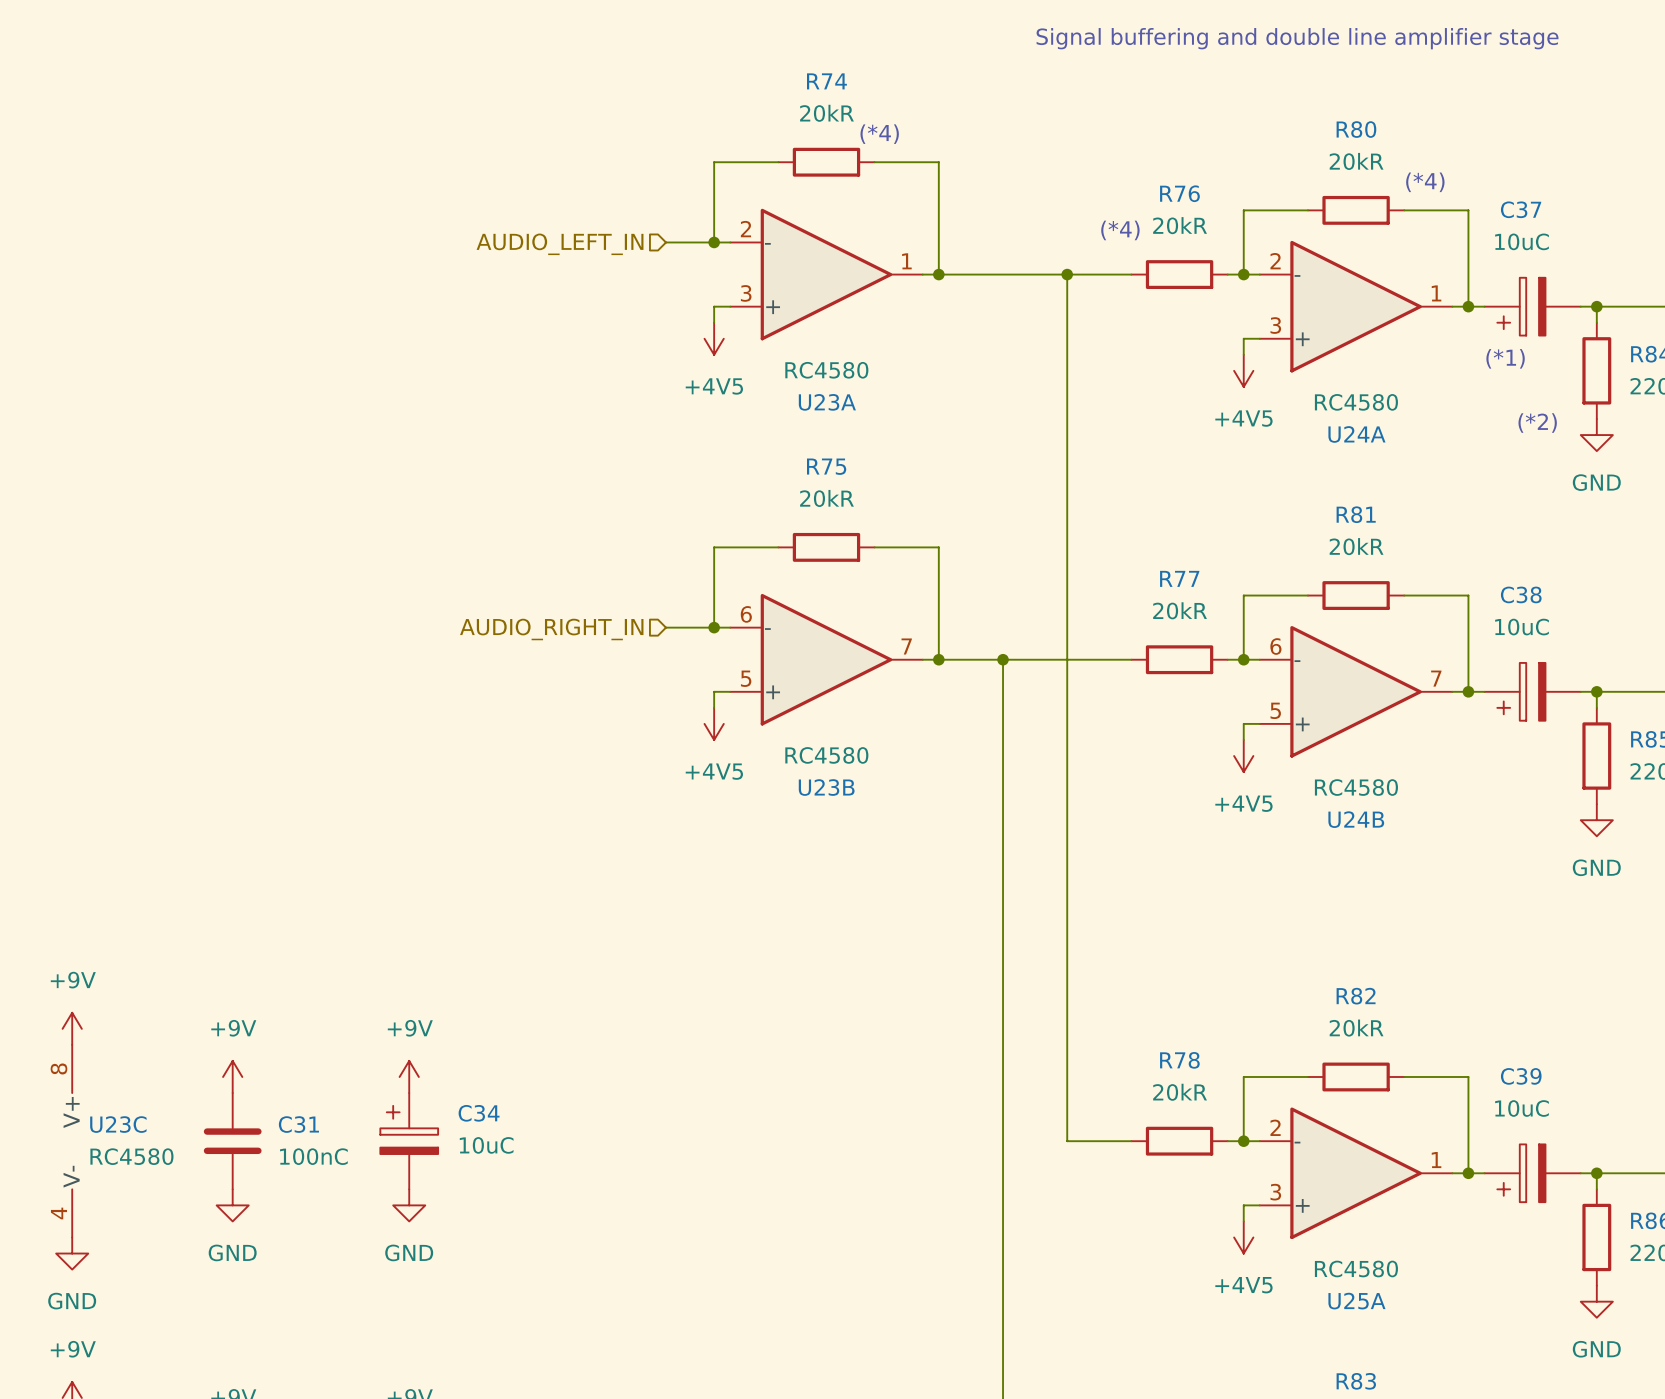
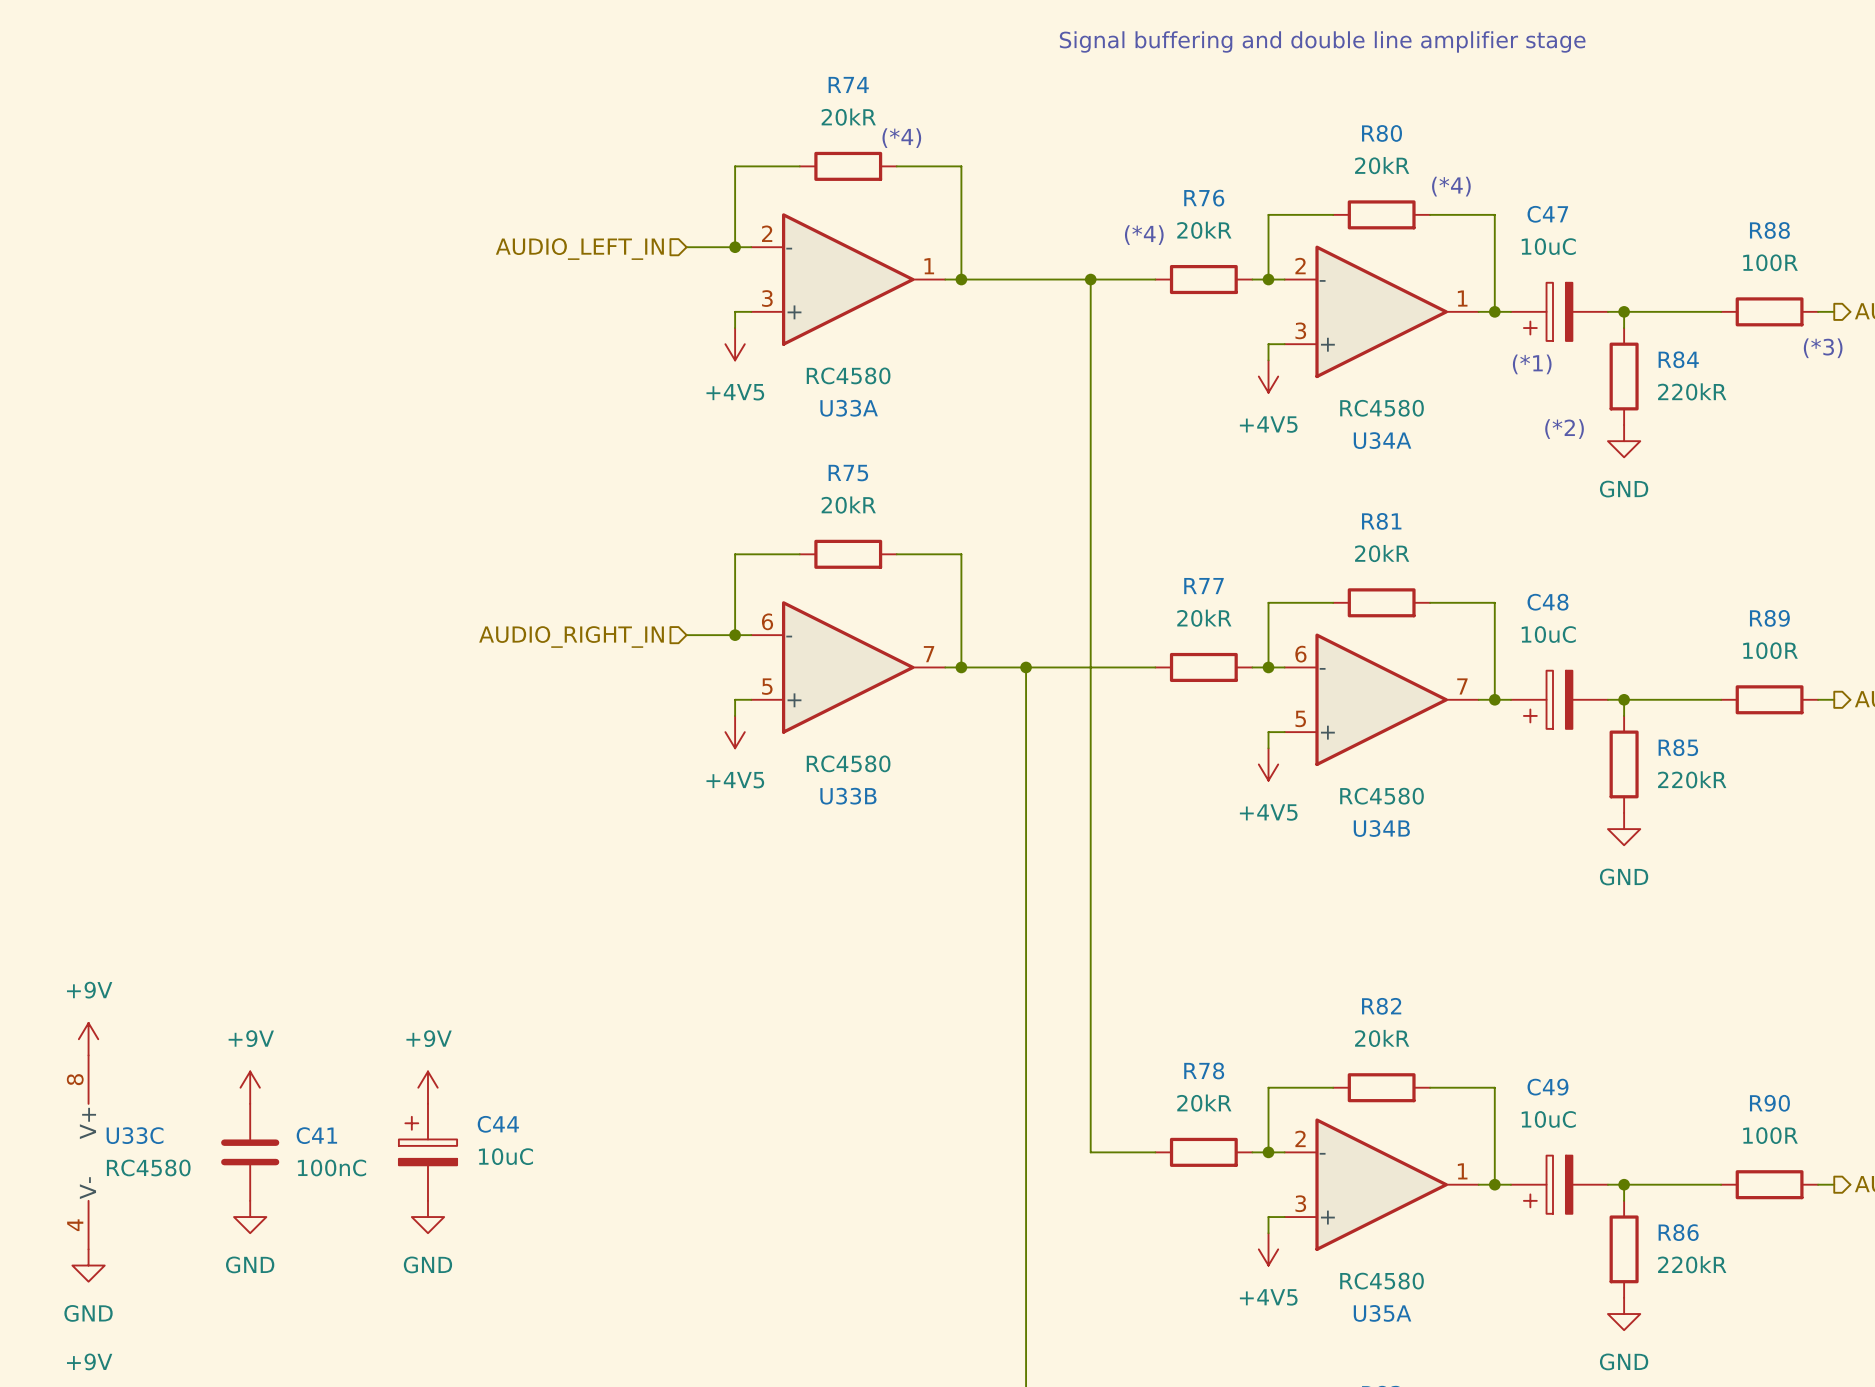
C37 name: C37 (1521, 209) -> C47 (1547, 214)
U23A name: U23A (827, 402) -> U33A (849, 408)
U24A name: U24A (1356, 434) -> U34A (1382, 440)
C38 name: C38 (1521, 594) -> C48 (1548, 602)
U23B name: U23B (826, 787) -> U33B (848, 796)
U24B name: U24B (1356, 819) -> U34B (1381, 828)
C39 name: C39 (1521, 1076) -> C49 (1547, 1087)
C34 name: C34 (479, 1113) -> C44 (498, 1124)
U23C name: U23C (118, 1124) -> U33C (135, 1135)
C31 name: C31 (298, 1124) -> C41 (316, 1135)
U25A name: U25A (1356, 1301) -> U35A (1382, 1313)

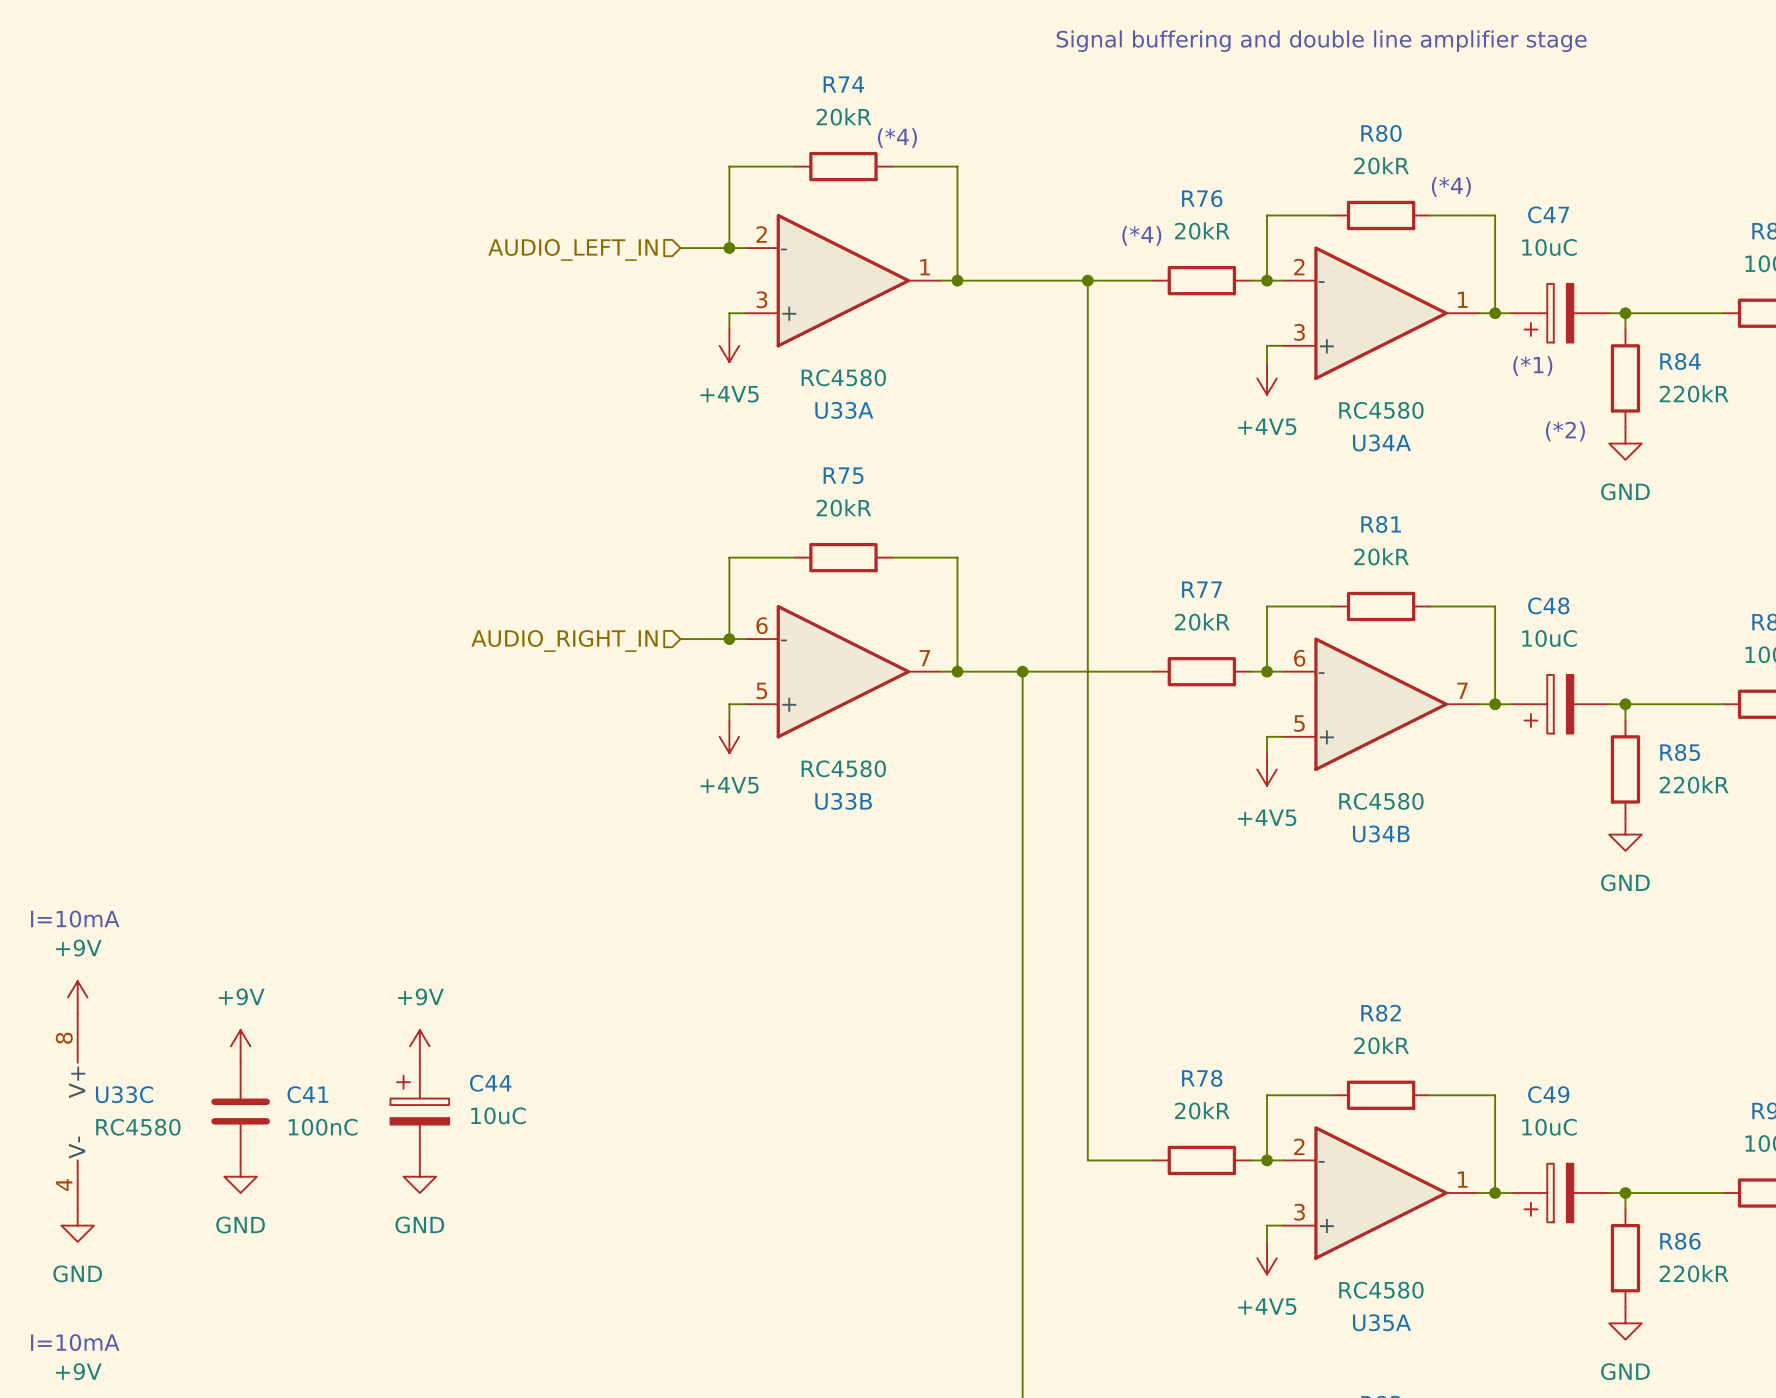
text: none -> I=10mA (75, 919)
power symbol position: +9V (88, 1039) -> +9V (77, 997)
power symbol position: +9V (250, 1087) -> +9V (240, 1046)
power symbol position: +9V (427, 1087) -> +9V (419, 1046)
U33C position: (88, 1152) -> (77, 1111)
C41 position: (250, 1152) -> (240, 1111)
C44 position: (427, 1152) -> (419, 1111)
power symbol position: GND (250, 1217) -> GND (240, 1176)
power symbol position: GND (427, 1217) -> GND (419, 1176)
power symbol position: GND (88, 1265) -> GND (77, 1225)
text: none -> I=10mA (75, 1342)

